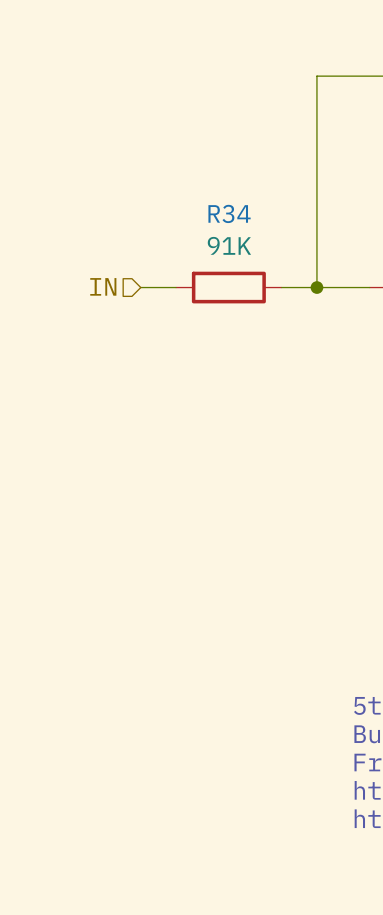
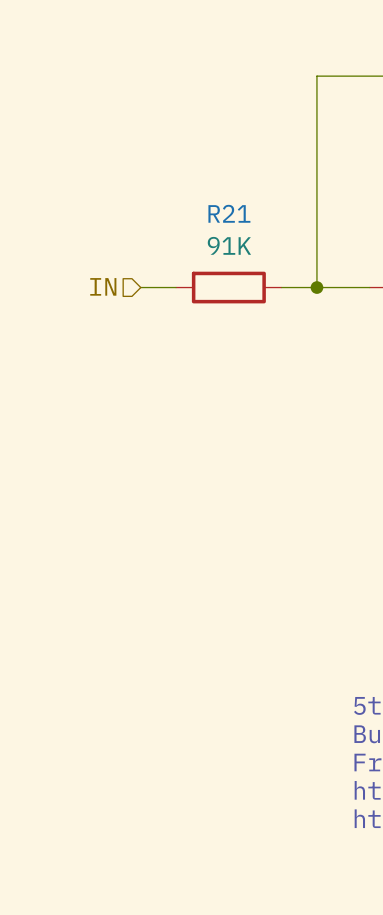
R34 name: R34 (229, 213) -> R21 (229, 213)

